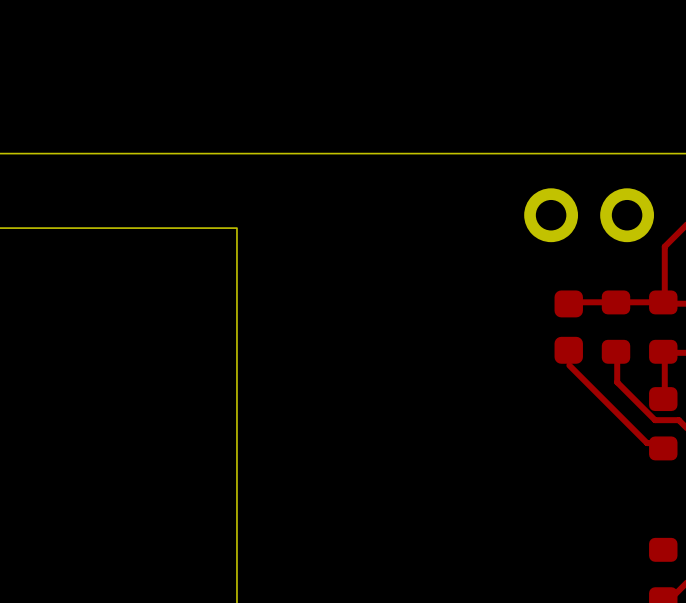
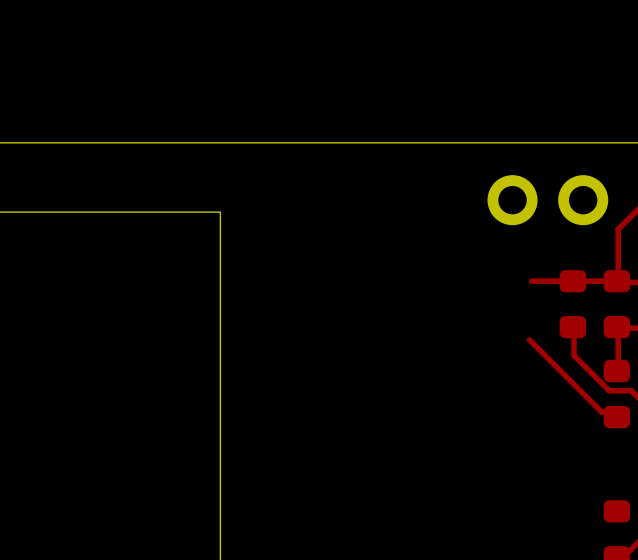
part: (568, 327) -> none

